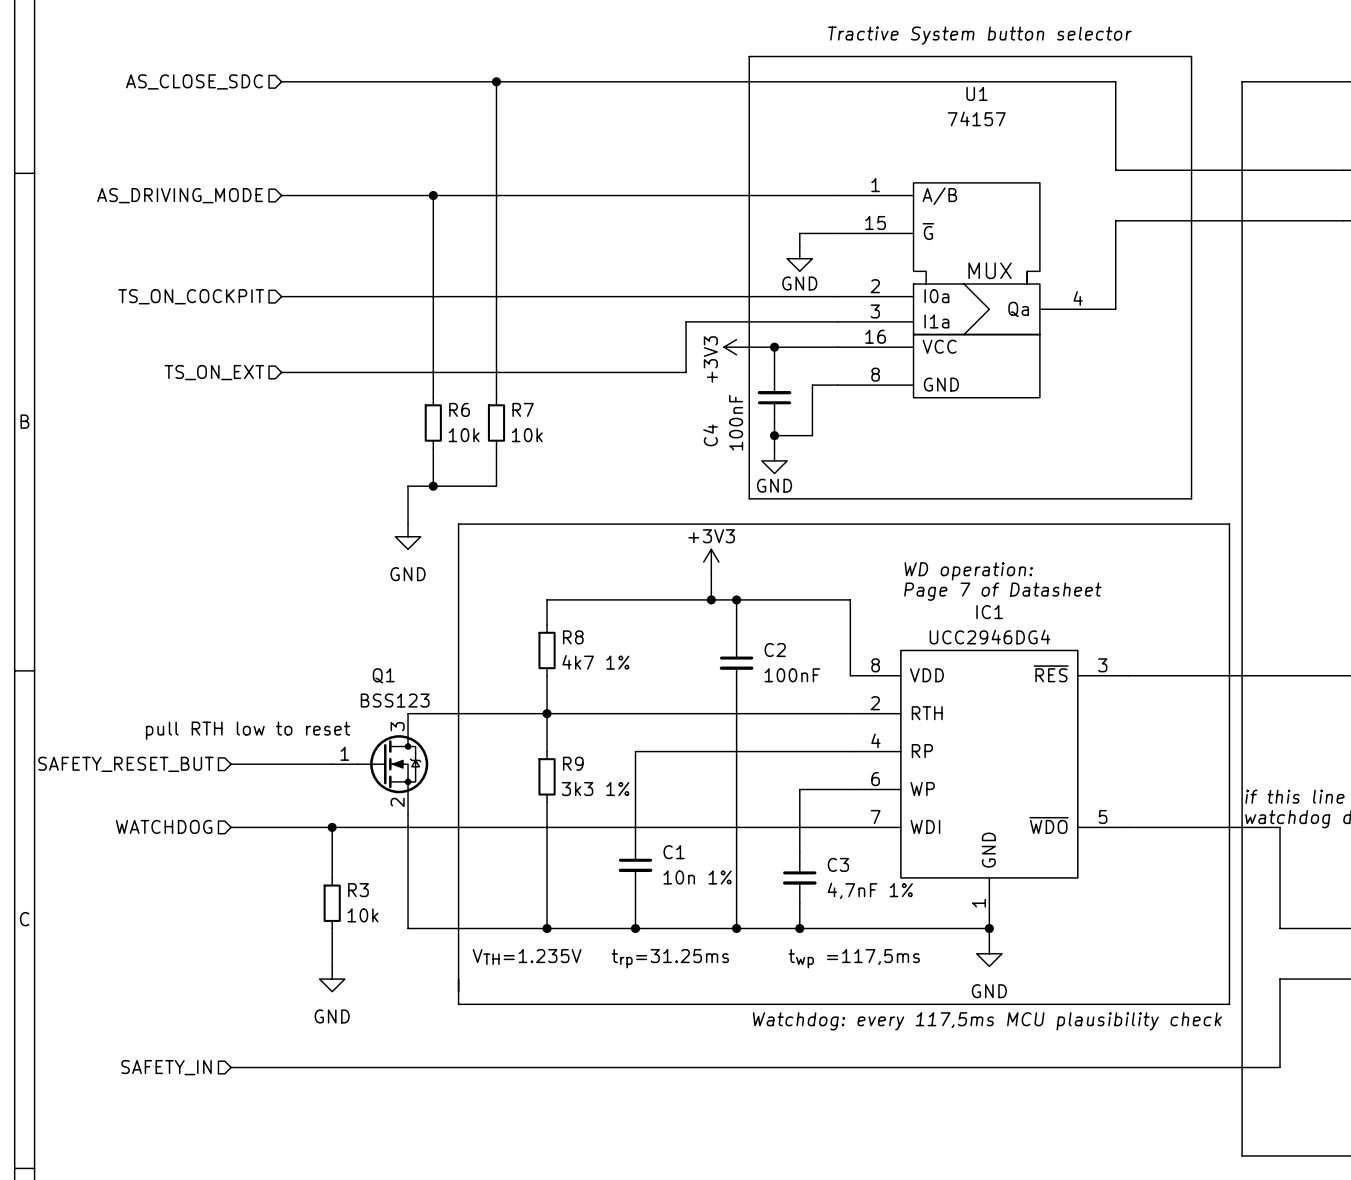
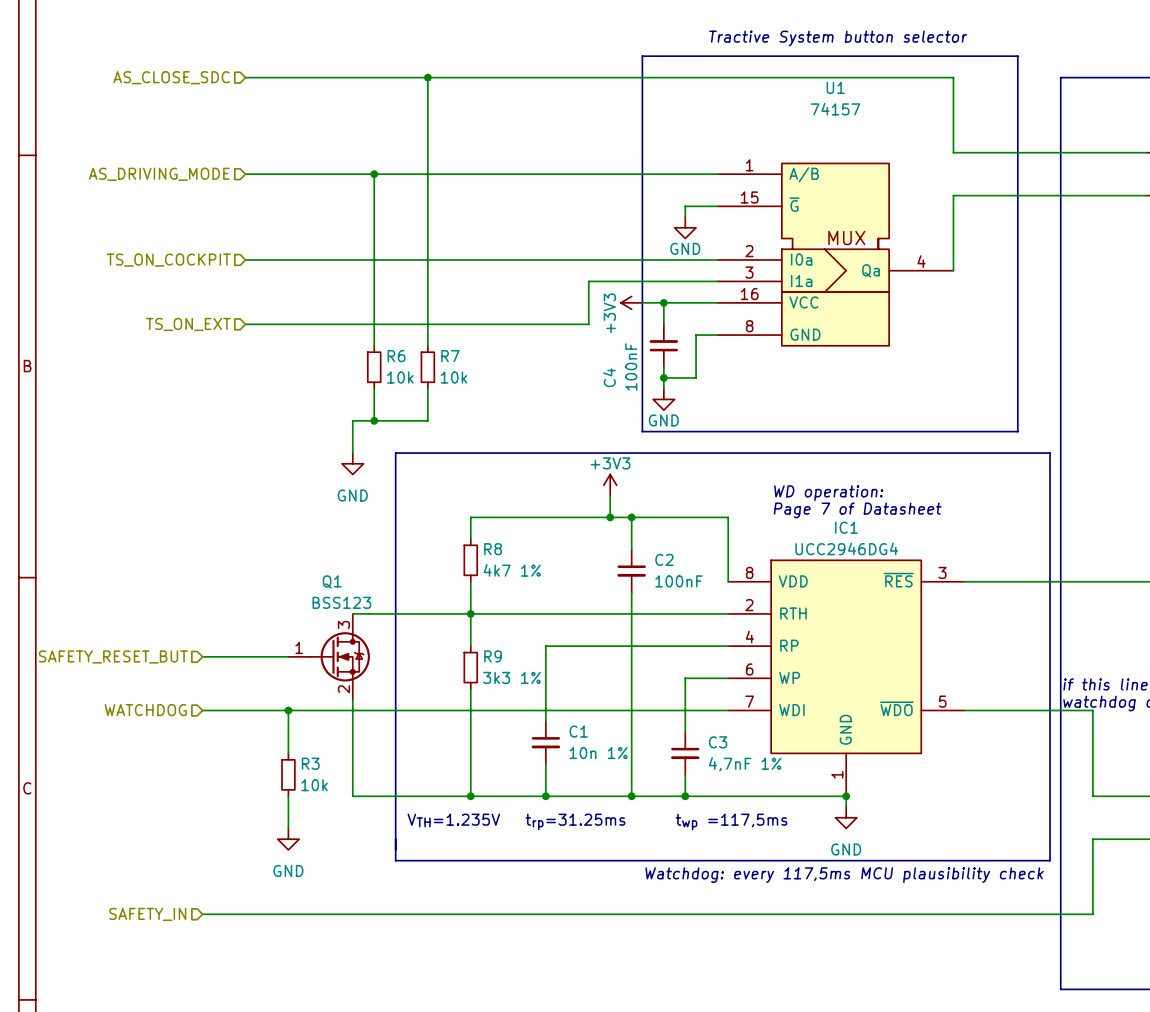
text: pull RTH low to reset (248, 730) -> none

